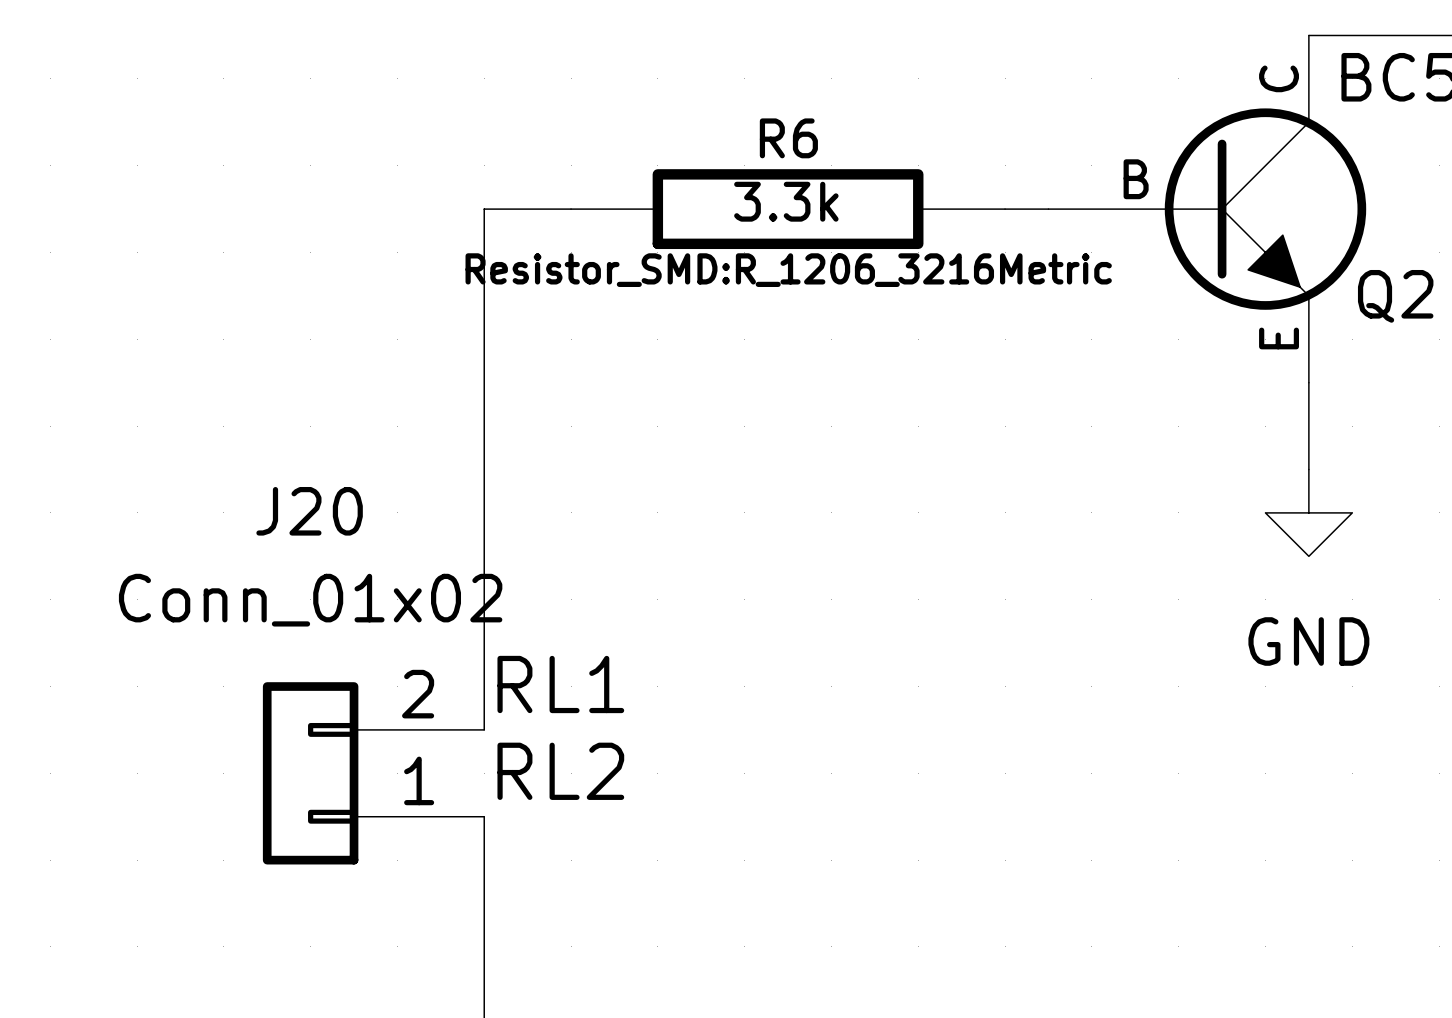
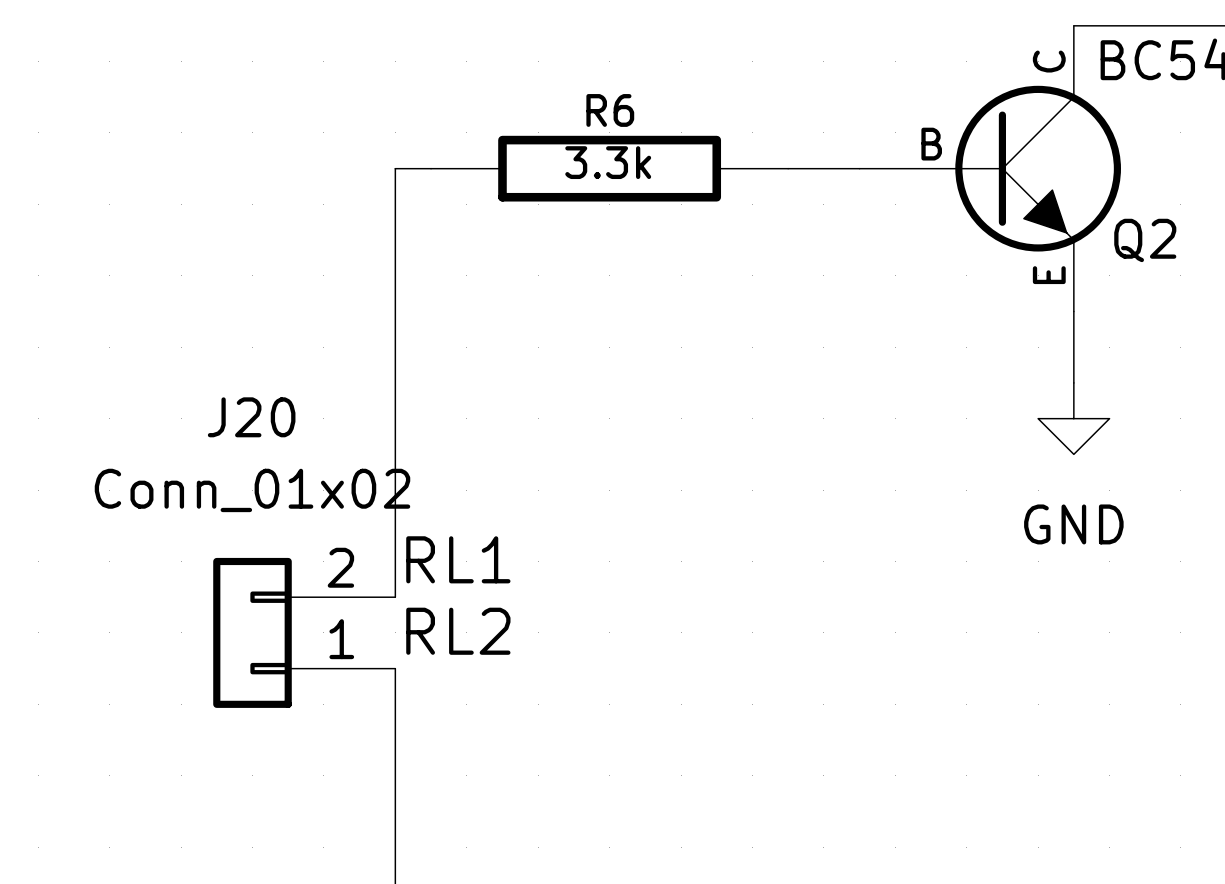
R6 position: (788, 209) -> (609, 168)
R6 text: Resistor_SMD:R_1206_3216Metric (788, 270) -> none

